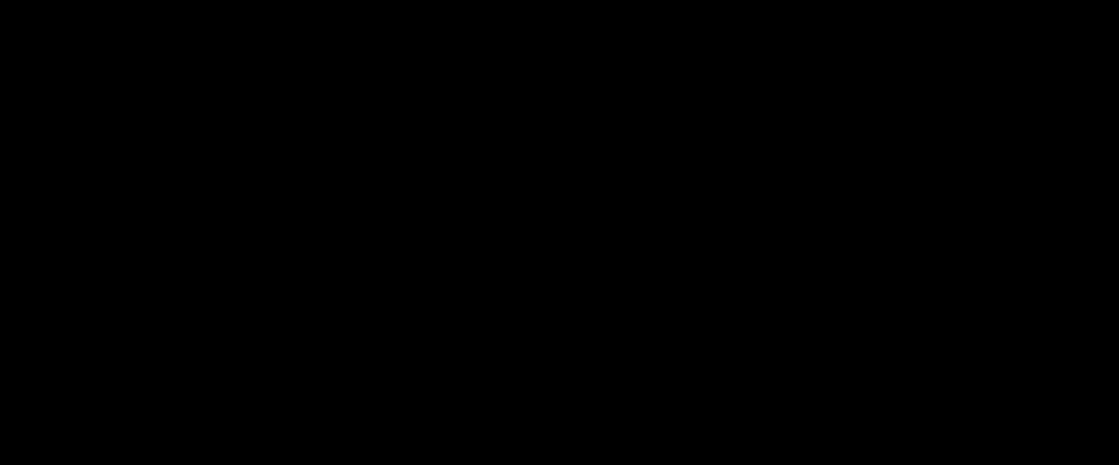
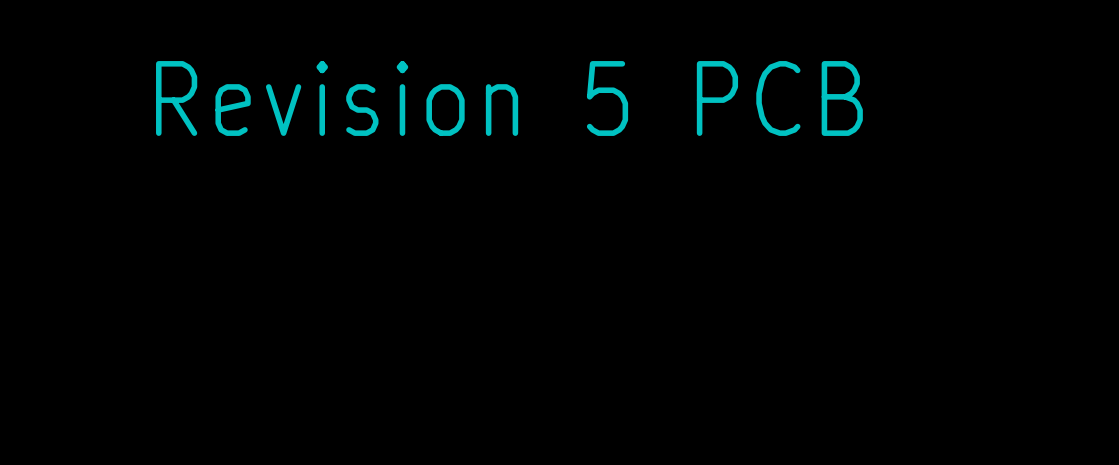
text: none -> Revision 5 PCB (509, 98)

